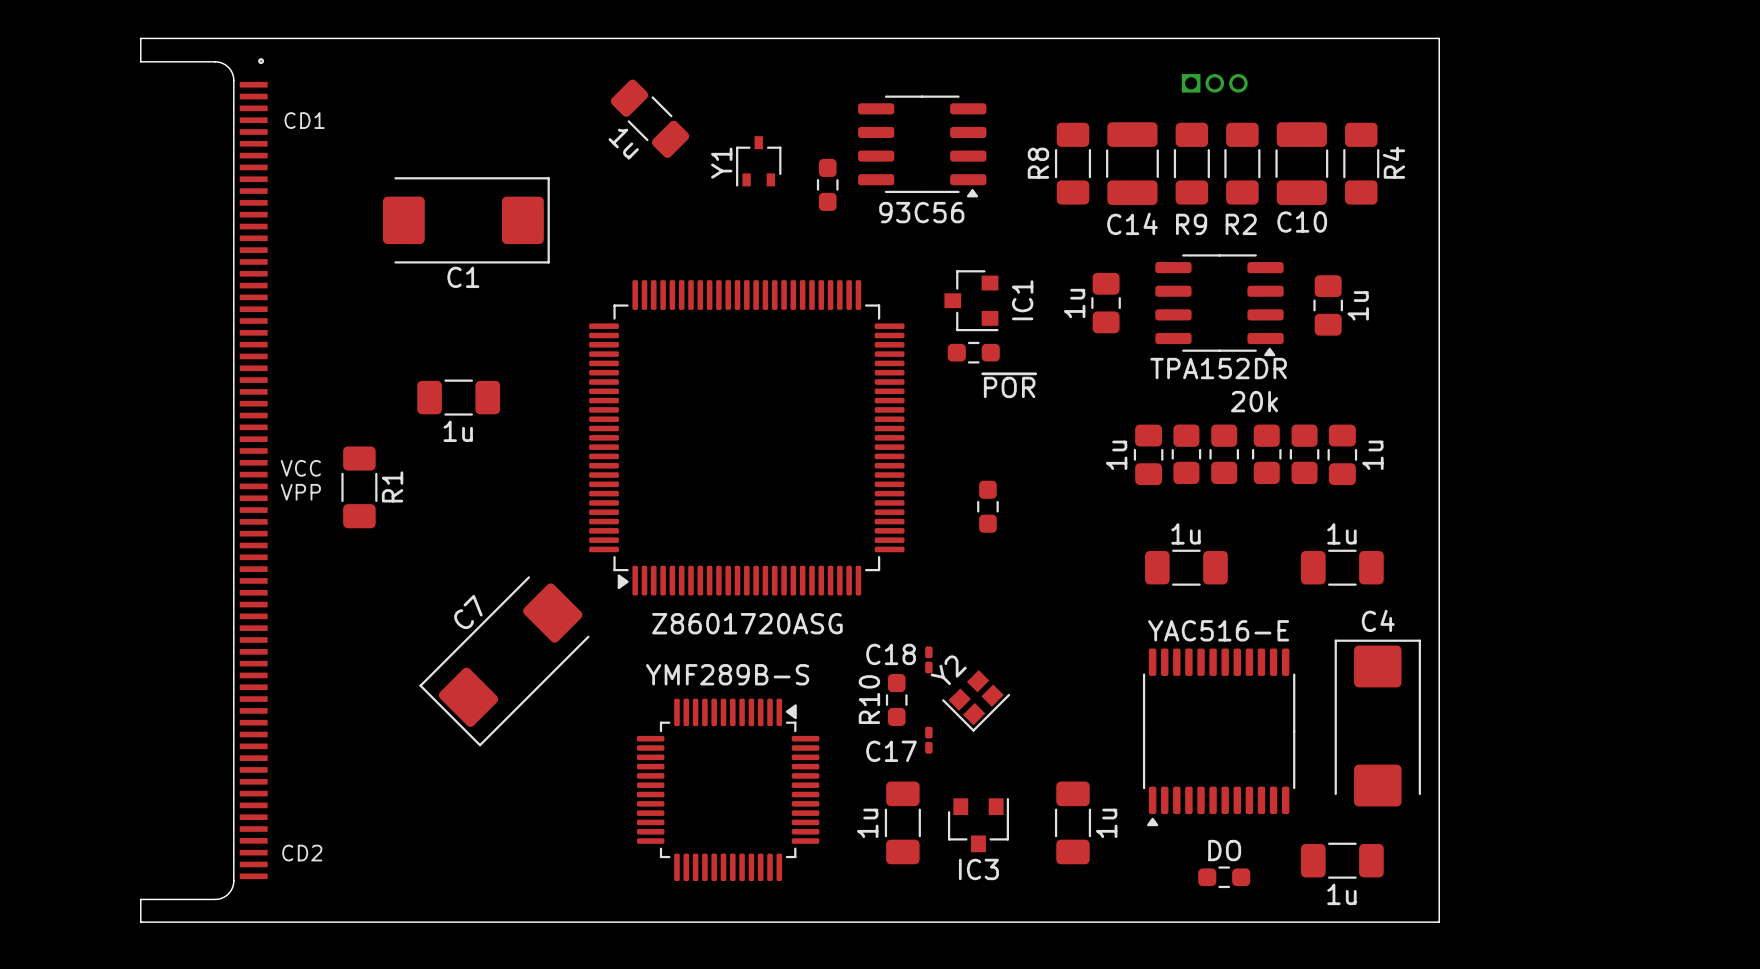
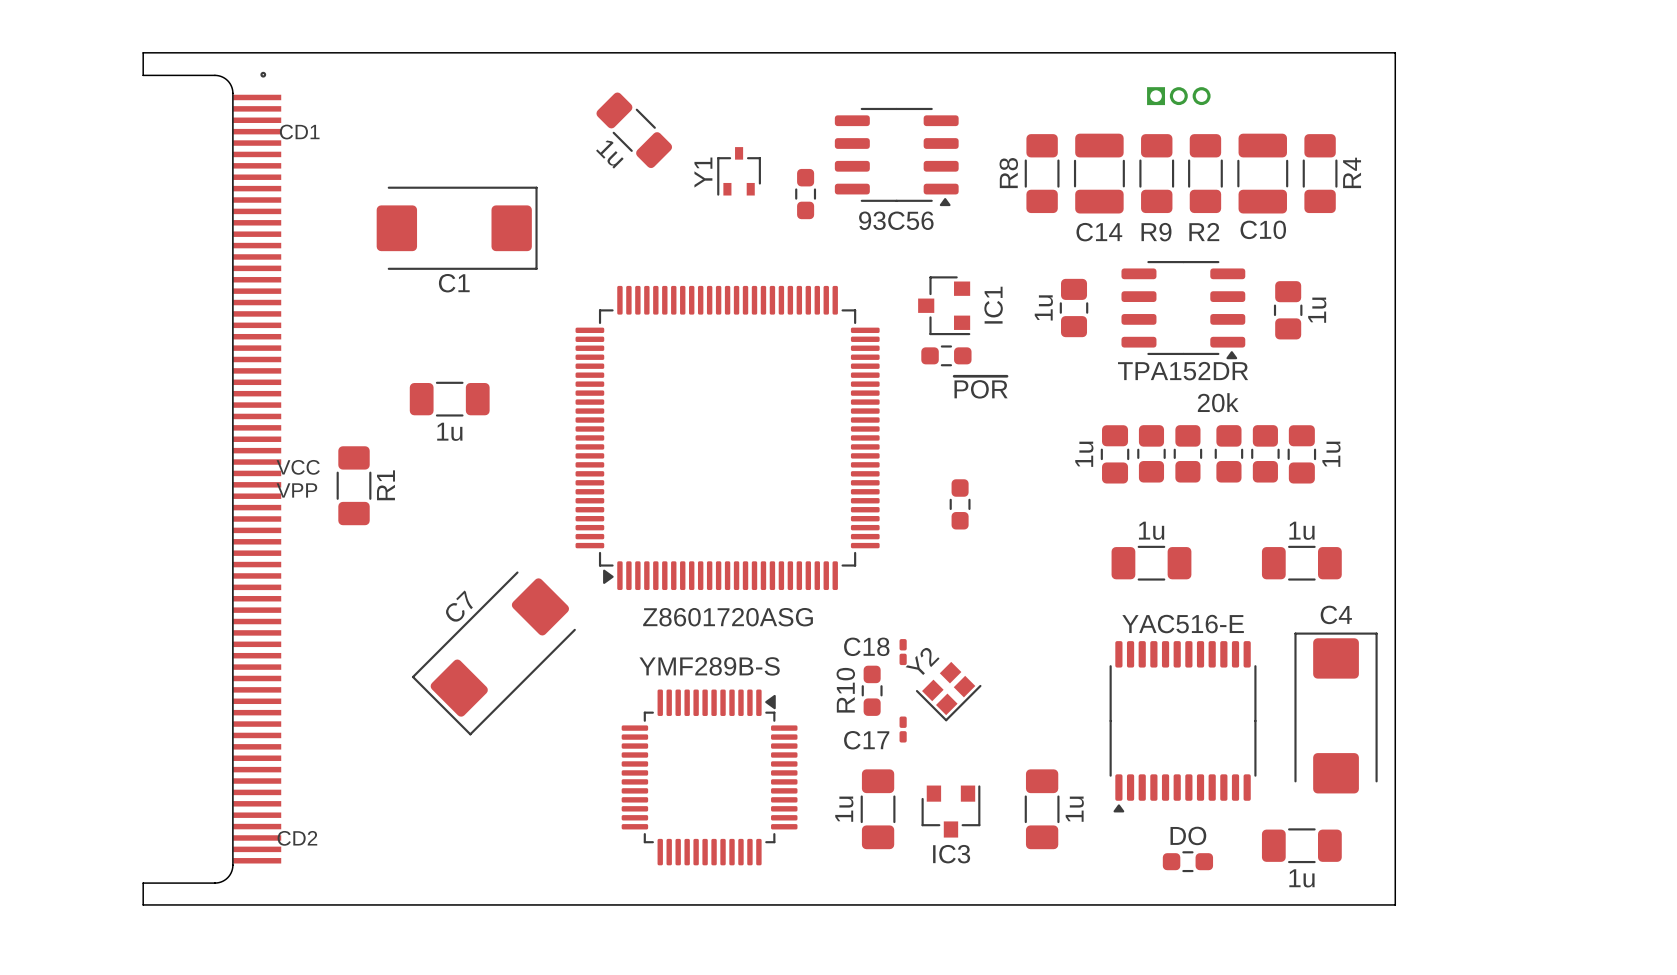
part footprint: [239, 58, 268, 880] -> [233, 71, 282, 864]

